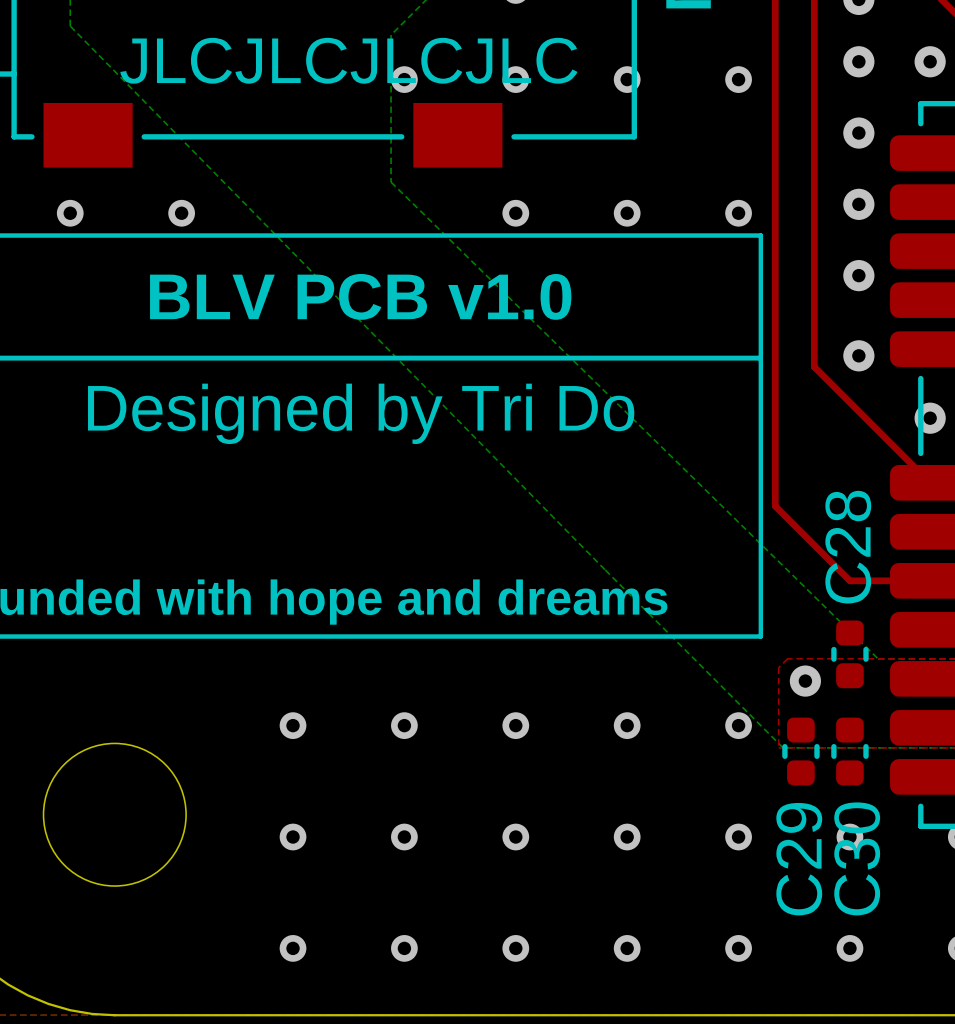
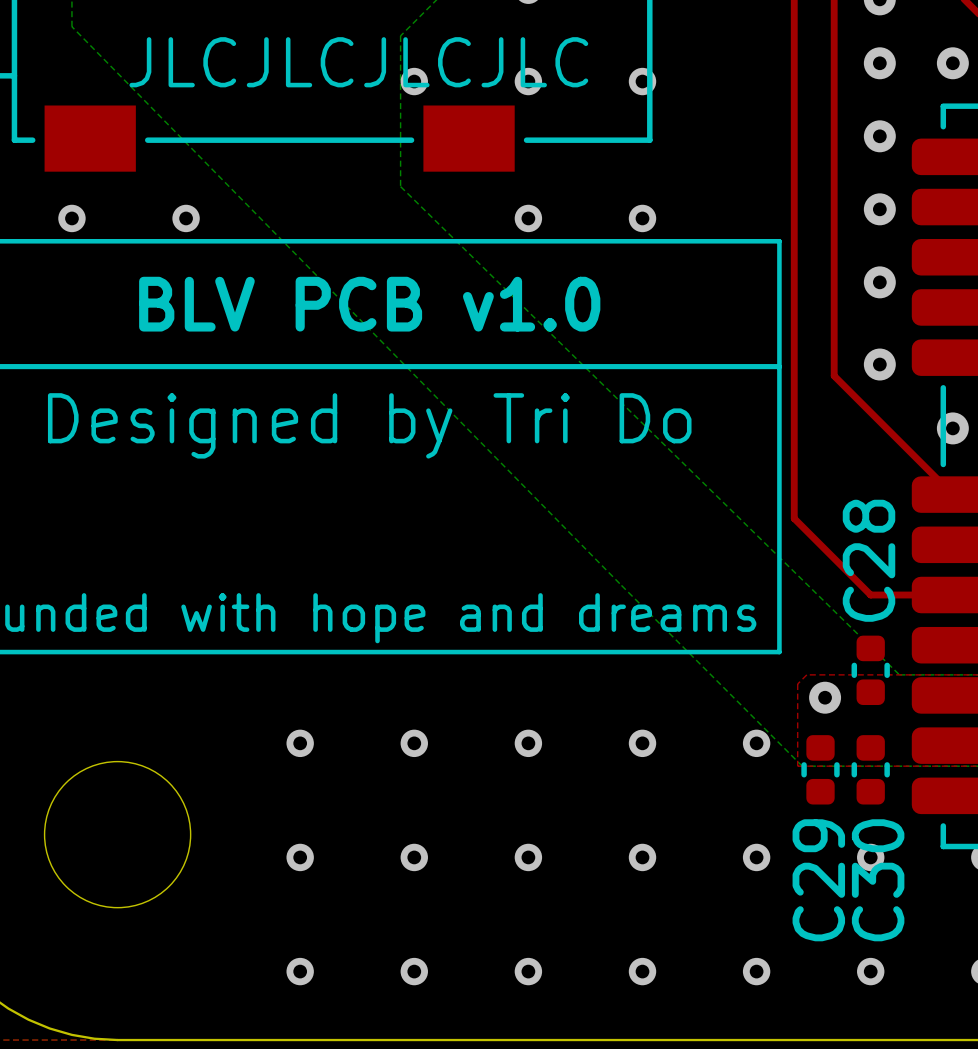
via: (738, 79) -> none
via: (738, 213) -> none

